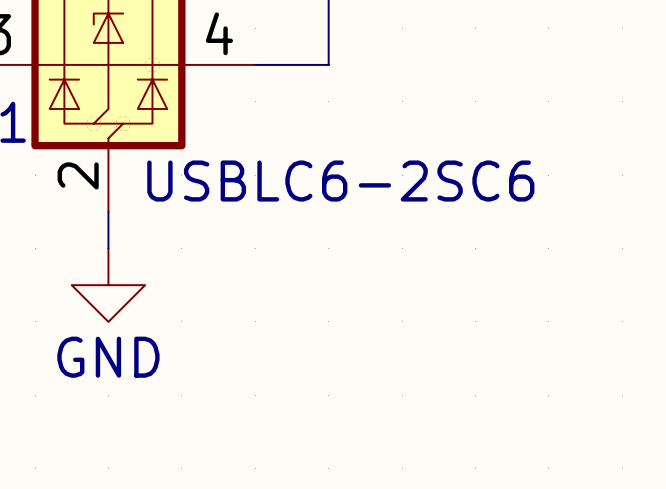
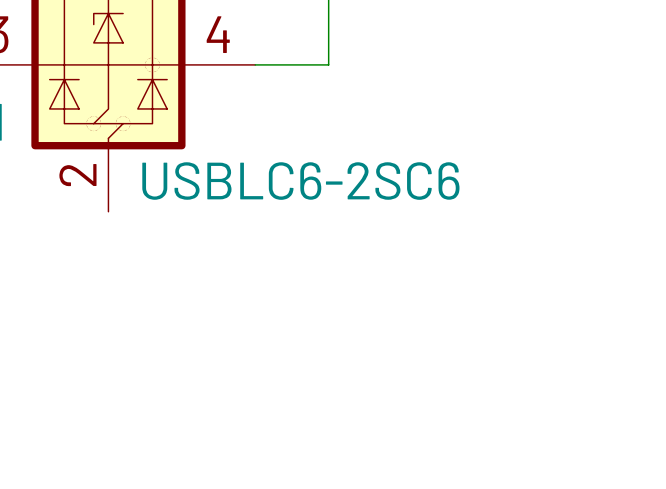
wire: (108, 211) (108, 248) -> none
power symbol: GND (108, 285) -> none

